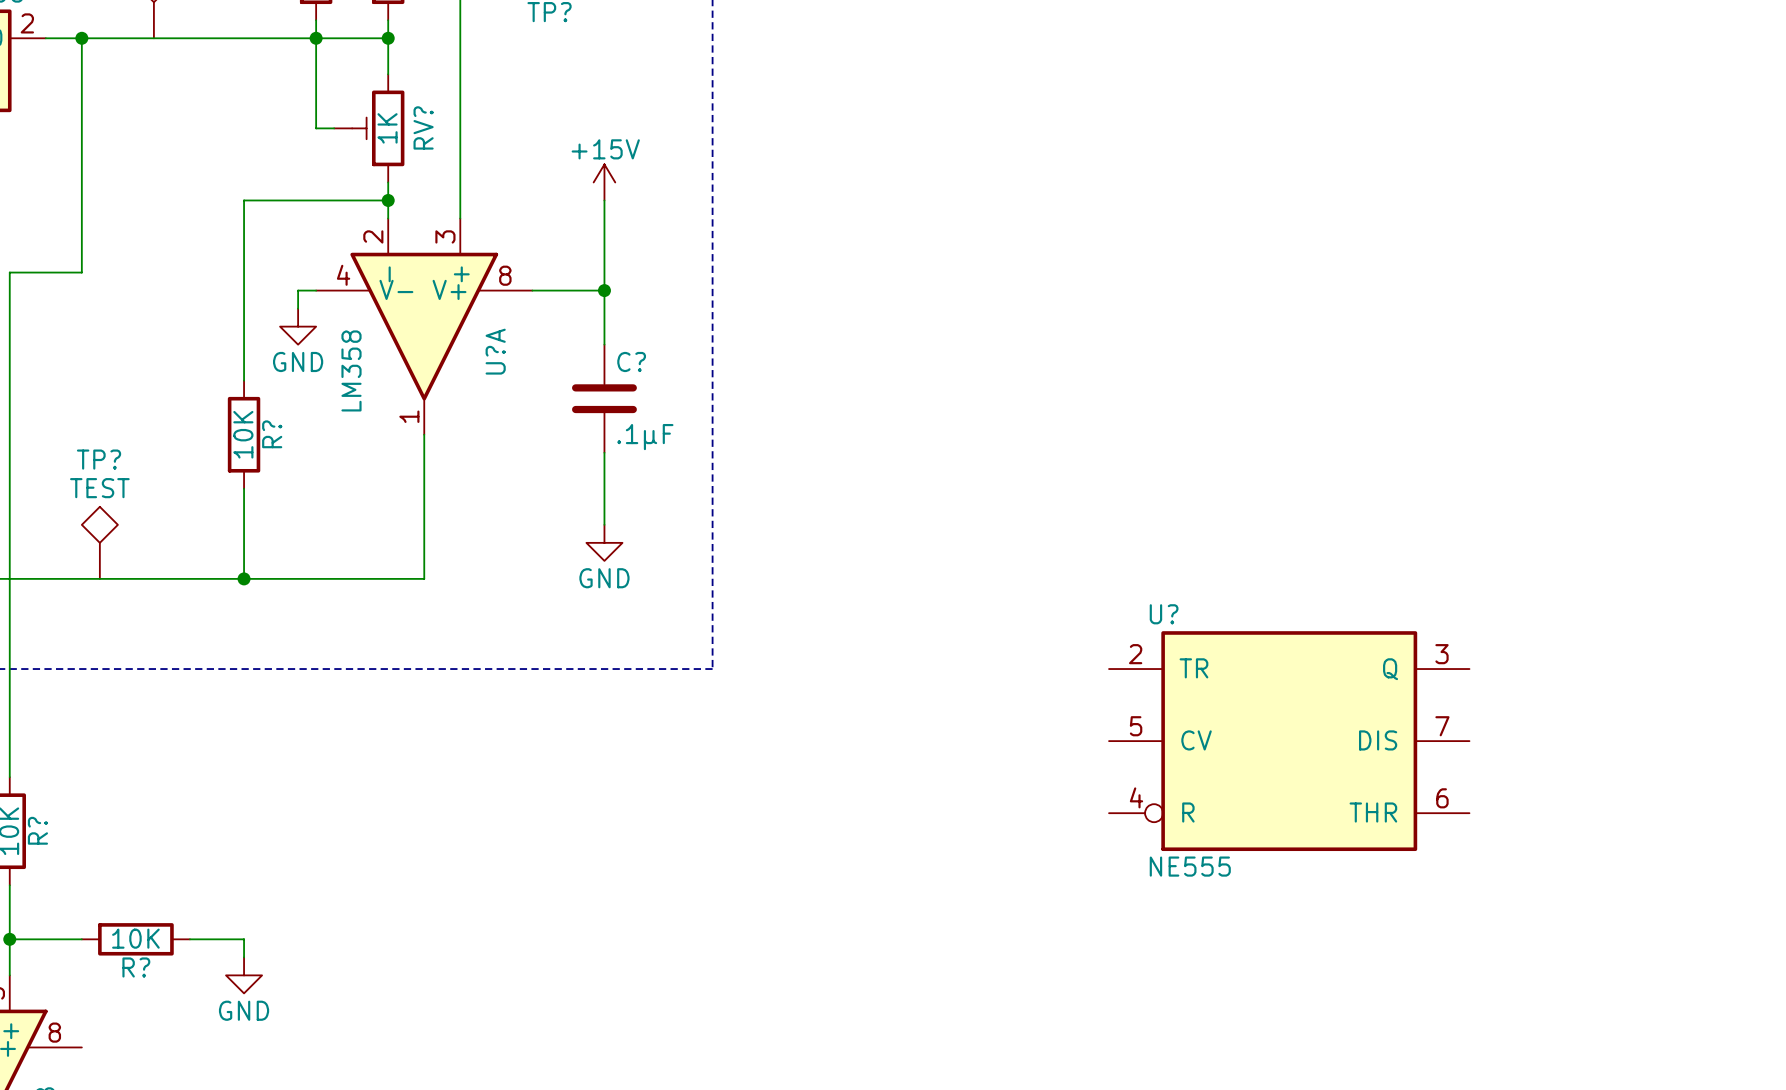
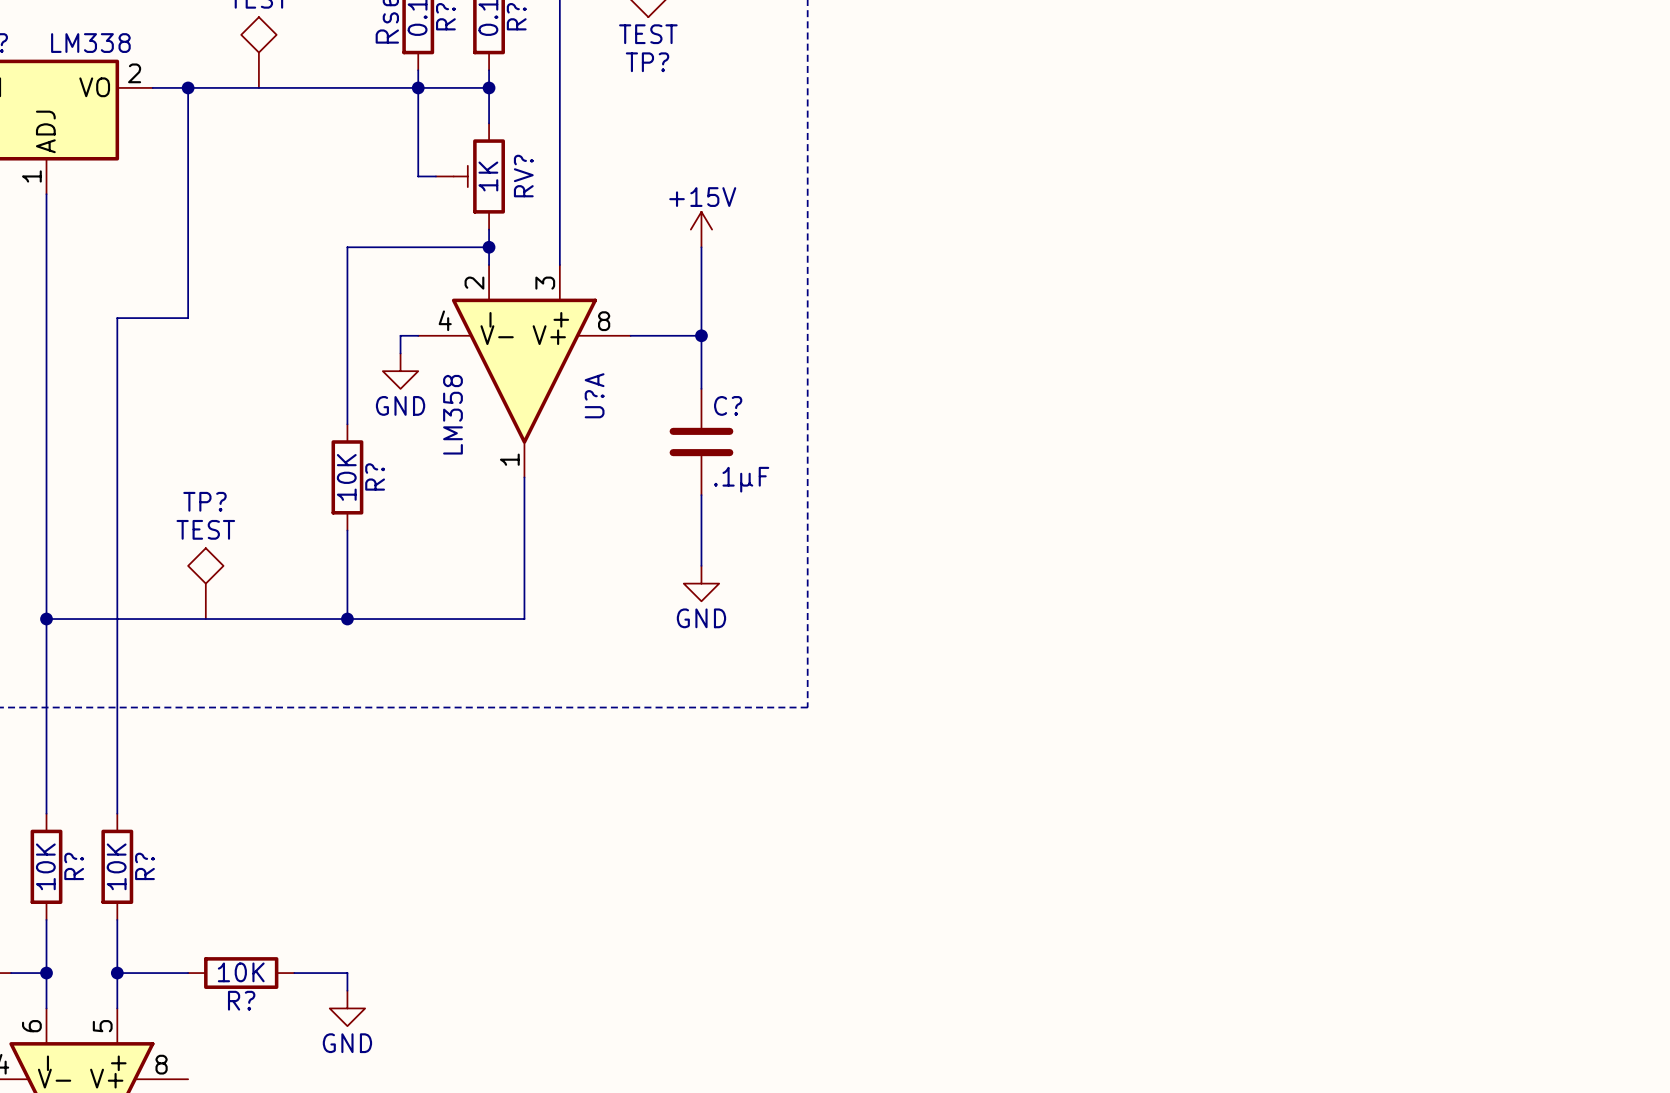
U?: NE555 (1289, 741) -> none

